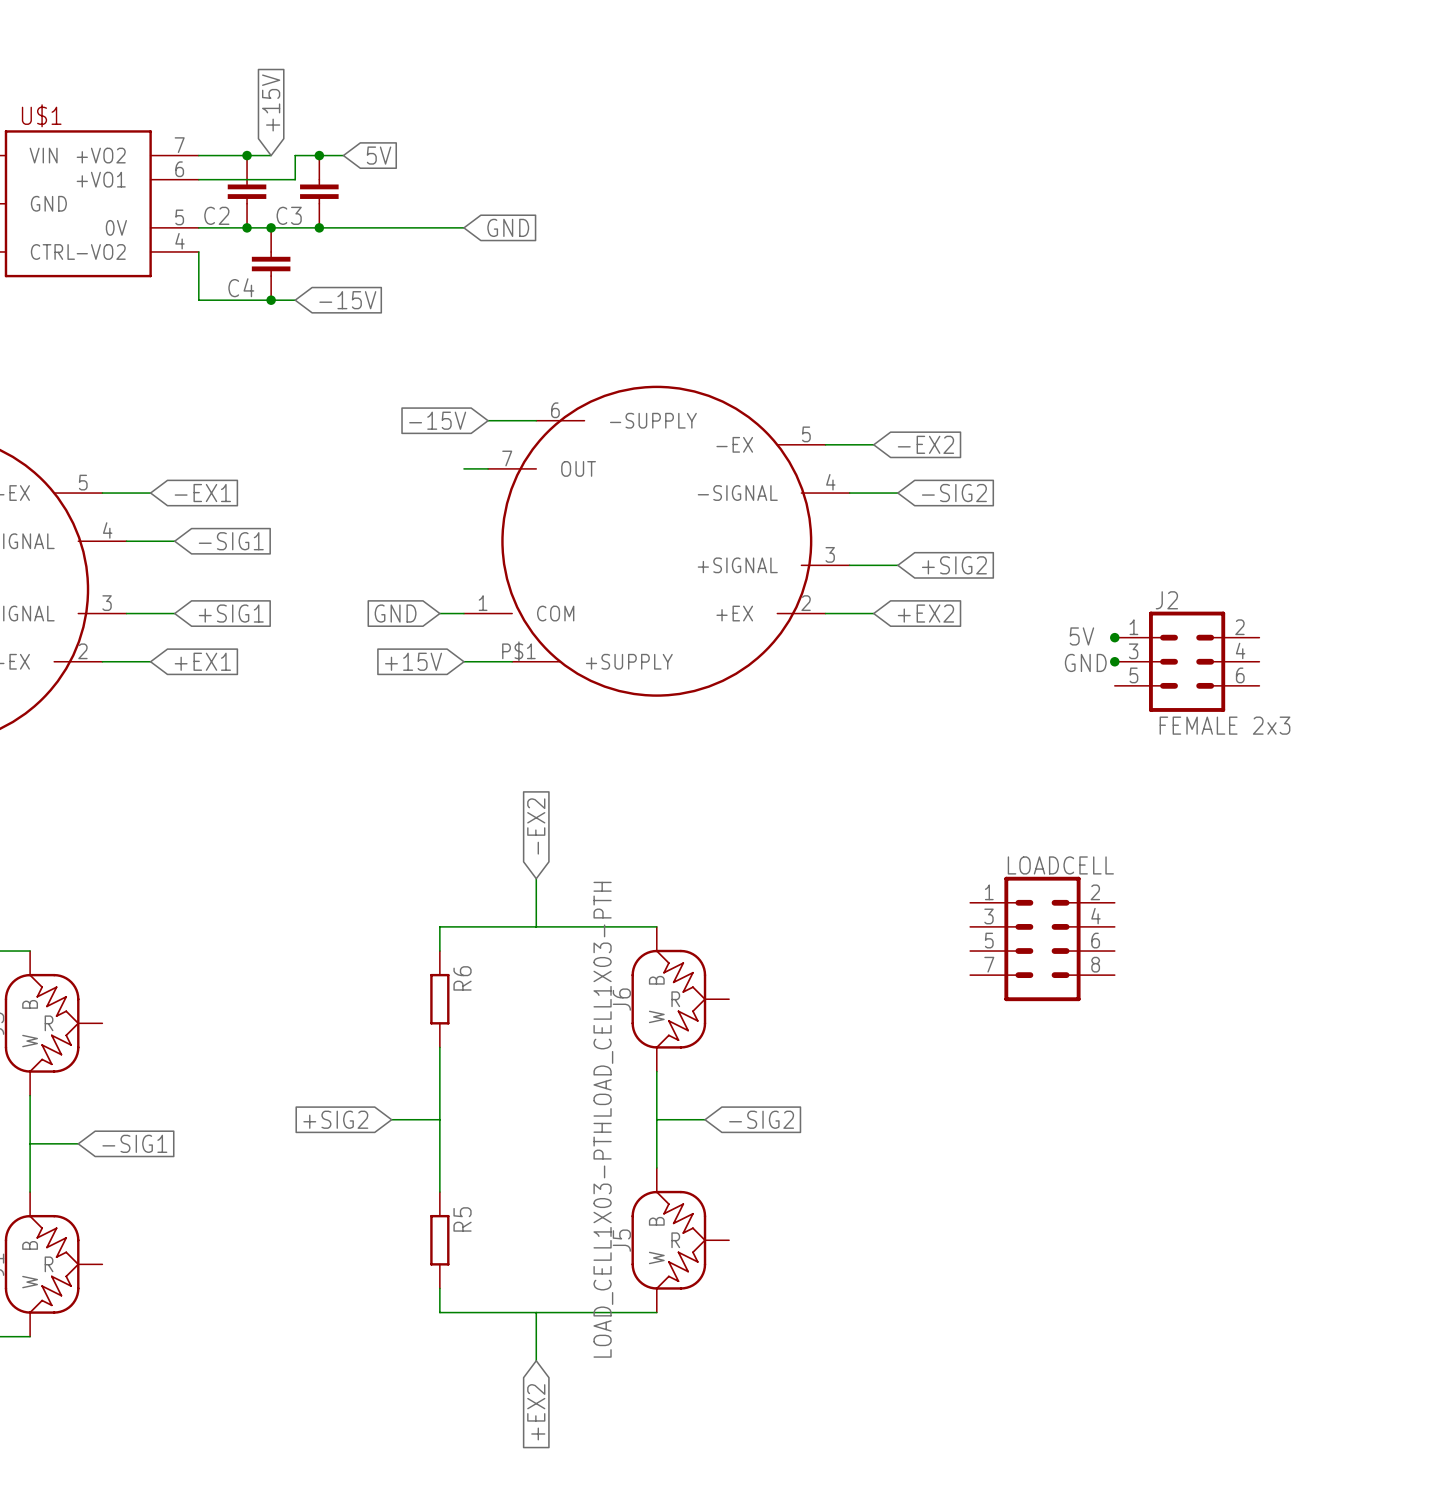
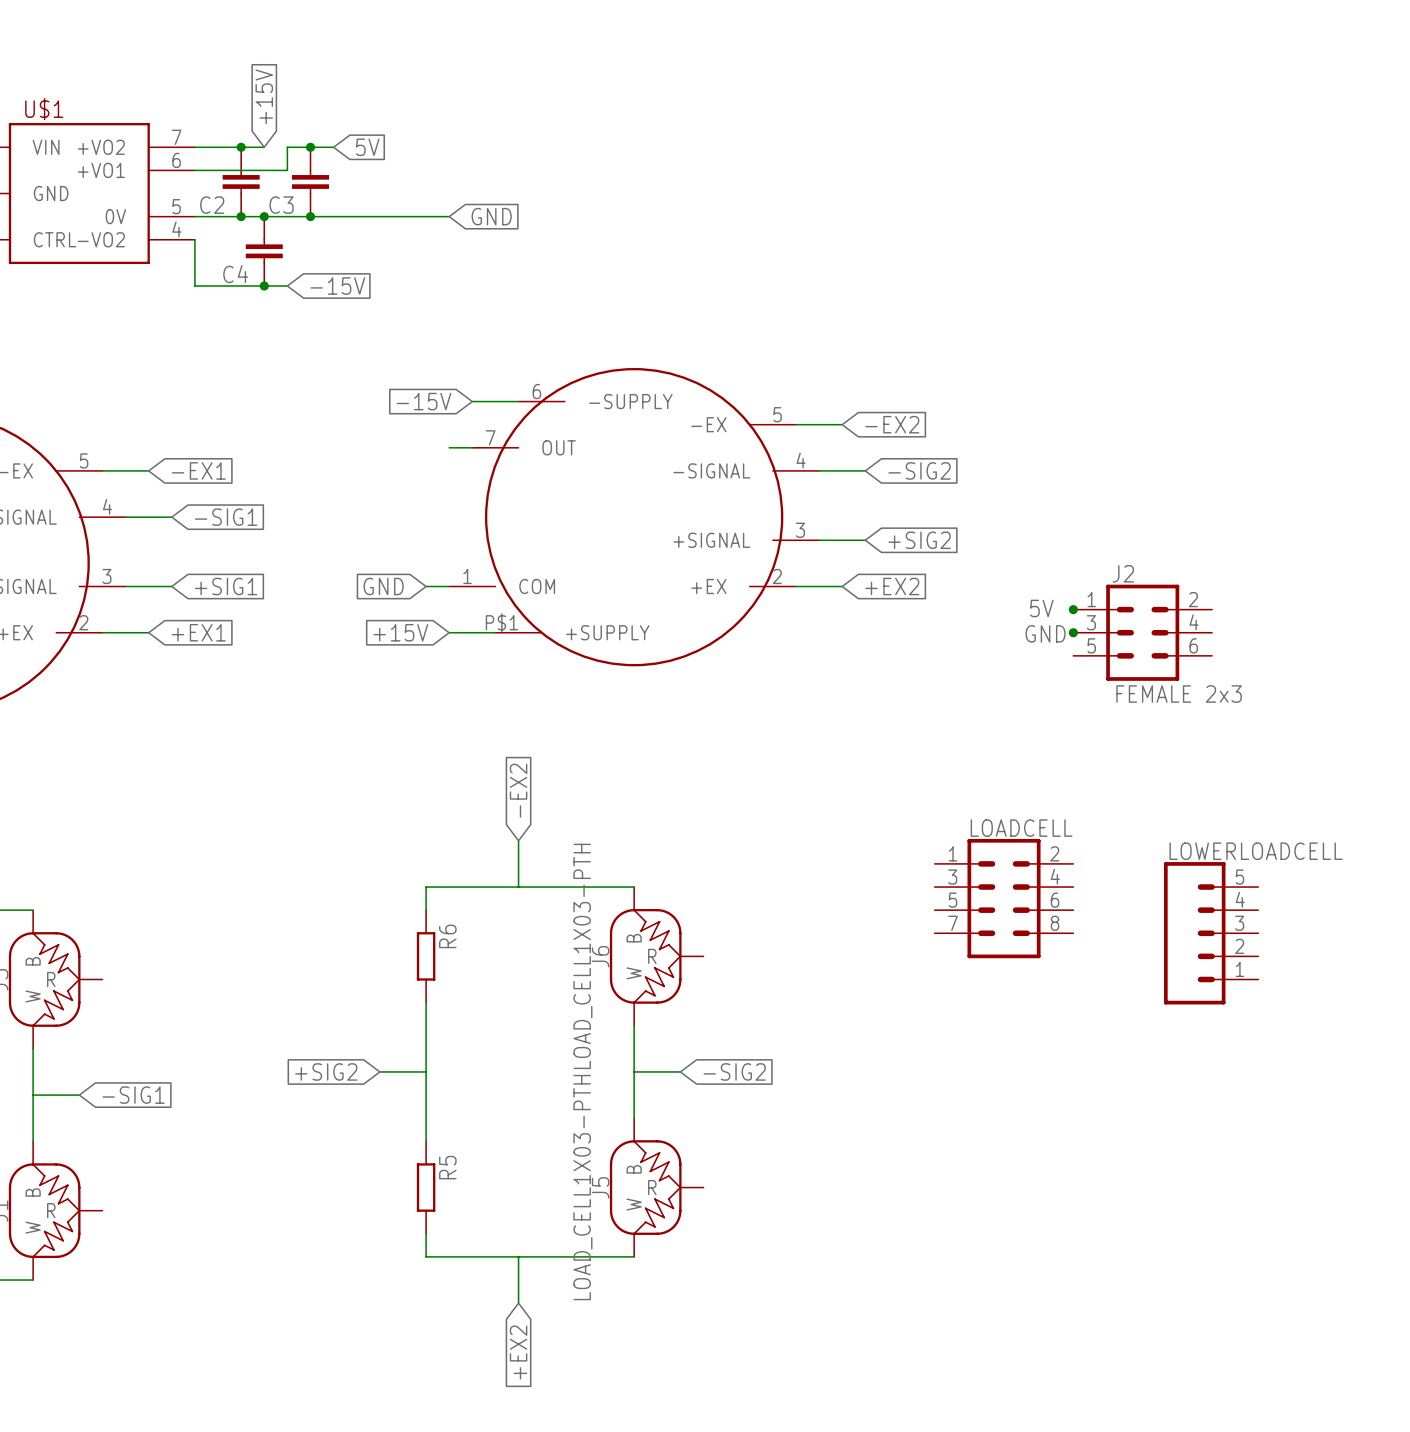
LOWERLOADCELL: none -> (1211, 933)

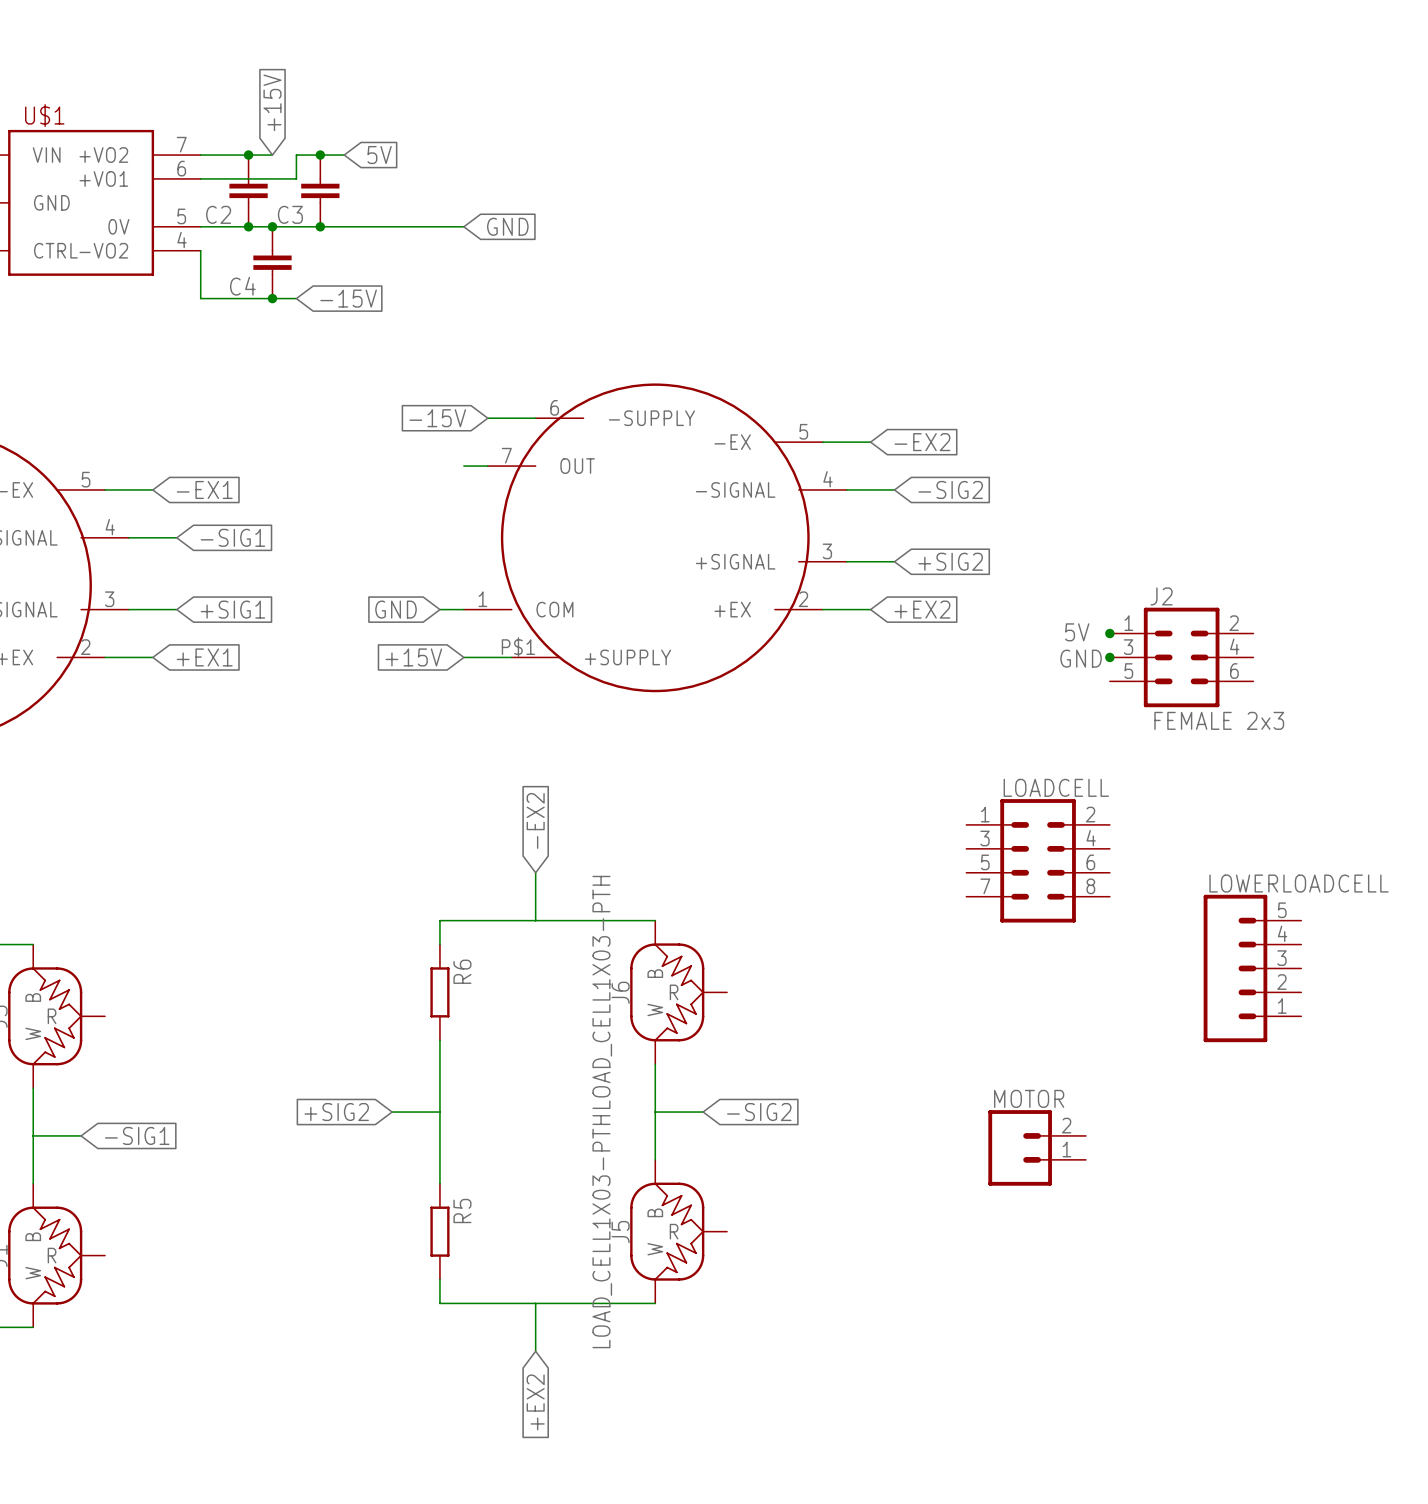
LOADCELL position: (1004, 898) -> (1038, 860)
MOTOR: none -> (1037, 1147)

